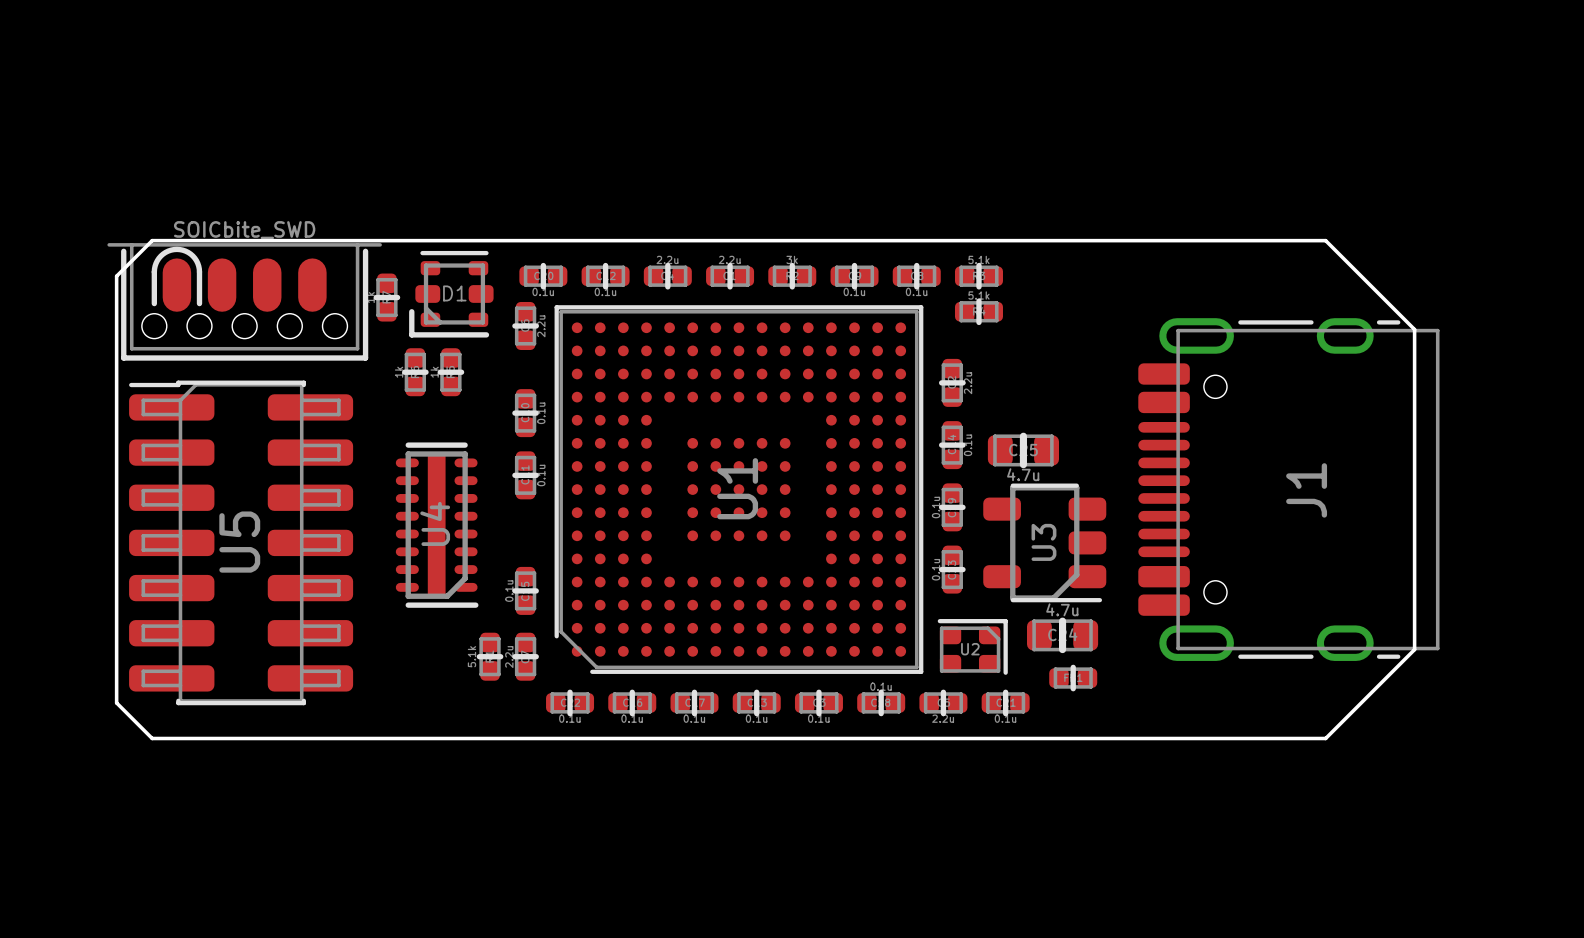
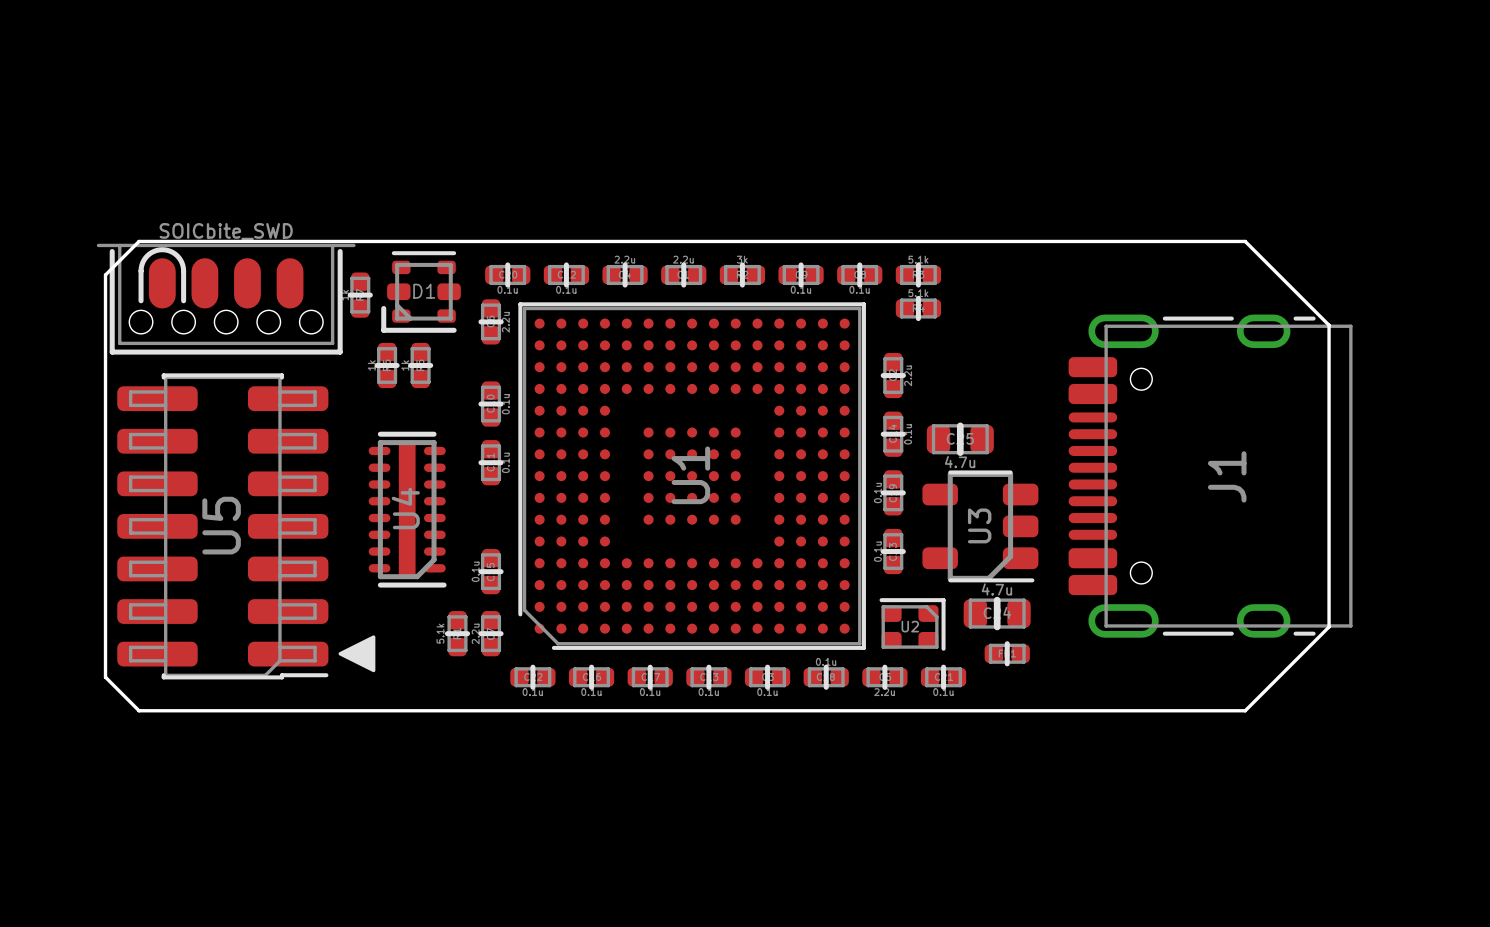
U5 rotation: 0° (241, 542) -> 180° (222, 526)
drawing: none -> [338, 635, 376, 673]

